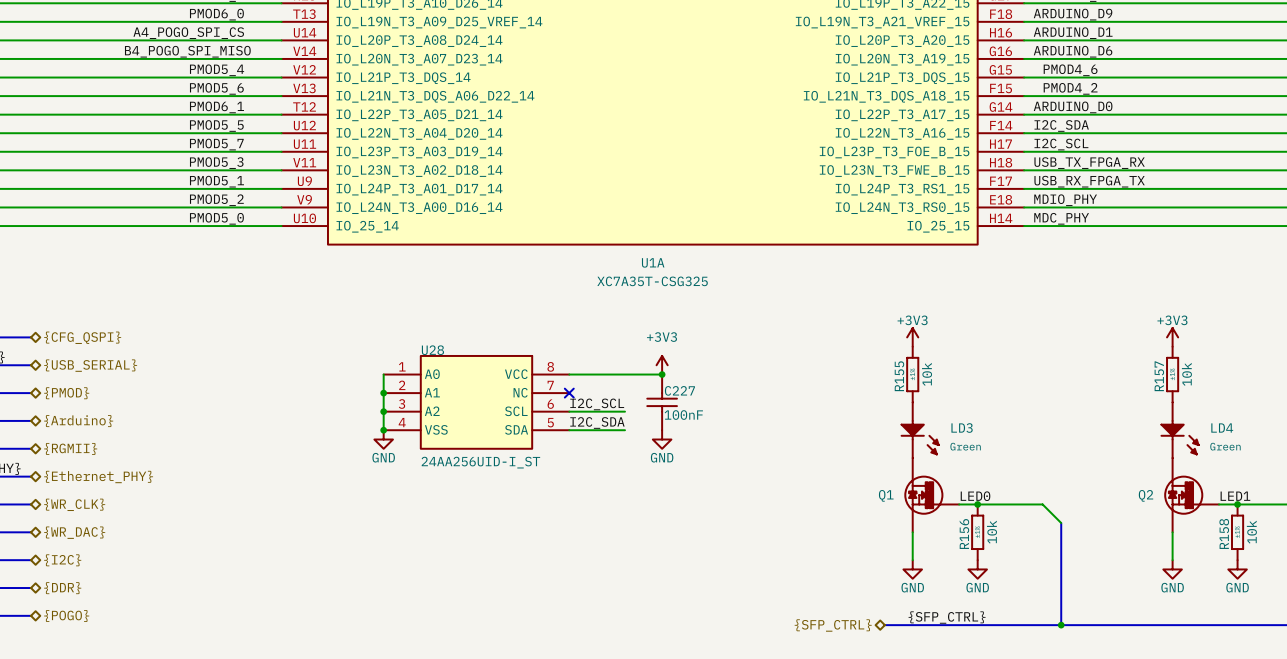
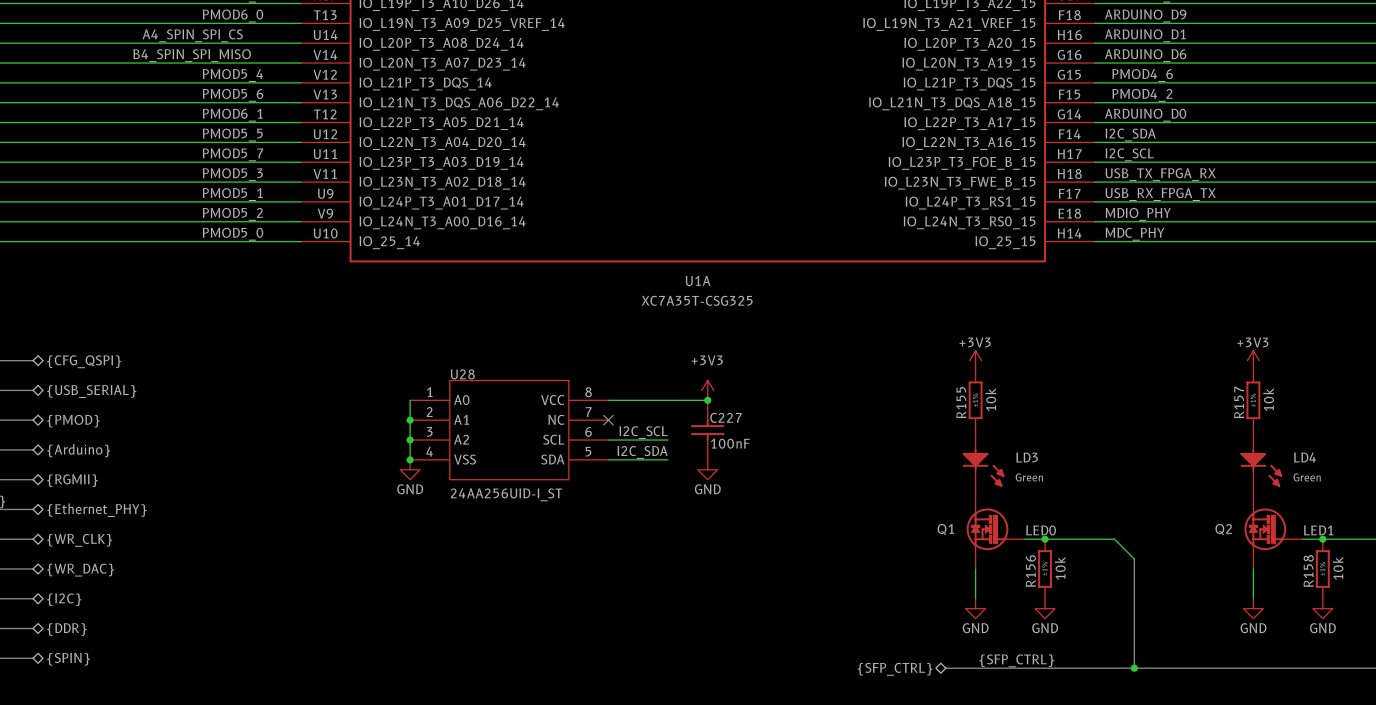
label: A4_POGO_SPI_CS (188, 33) -> A4_SPIN_SPI_CS (192, 35)
label: B4_POGO_SPI_MISO (187, 51) -> B4_SPIN_SPI_MISO (192, 55)
hierarchical label: {POGO} (66, 616) -> {SPIN} (68, 659)

